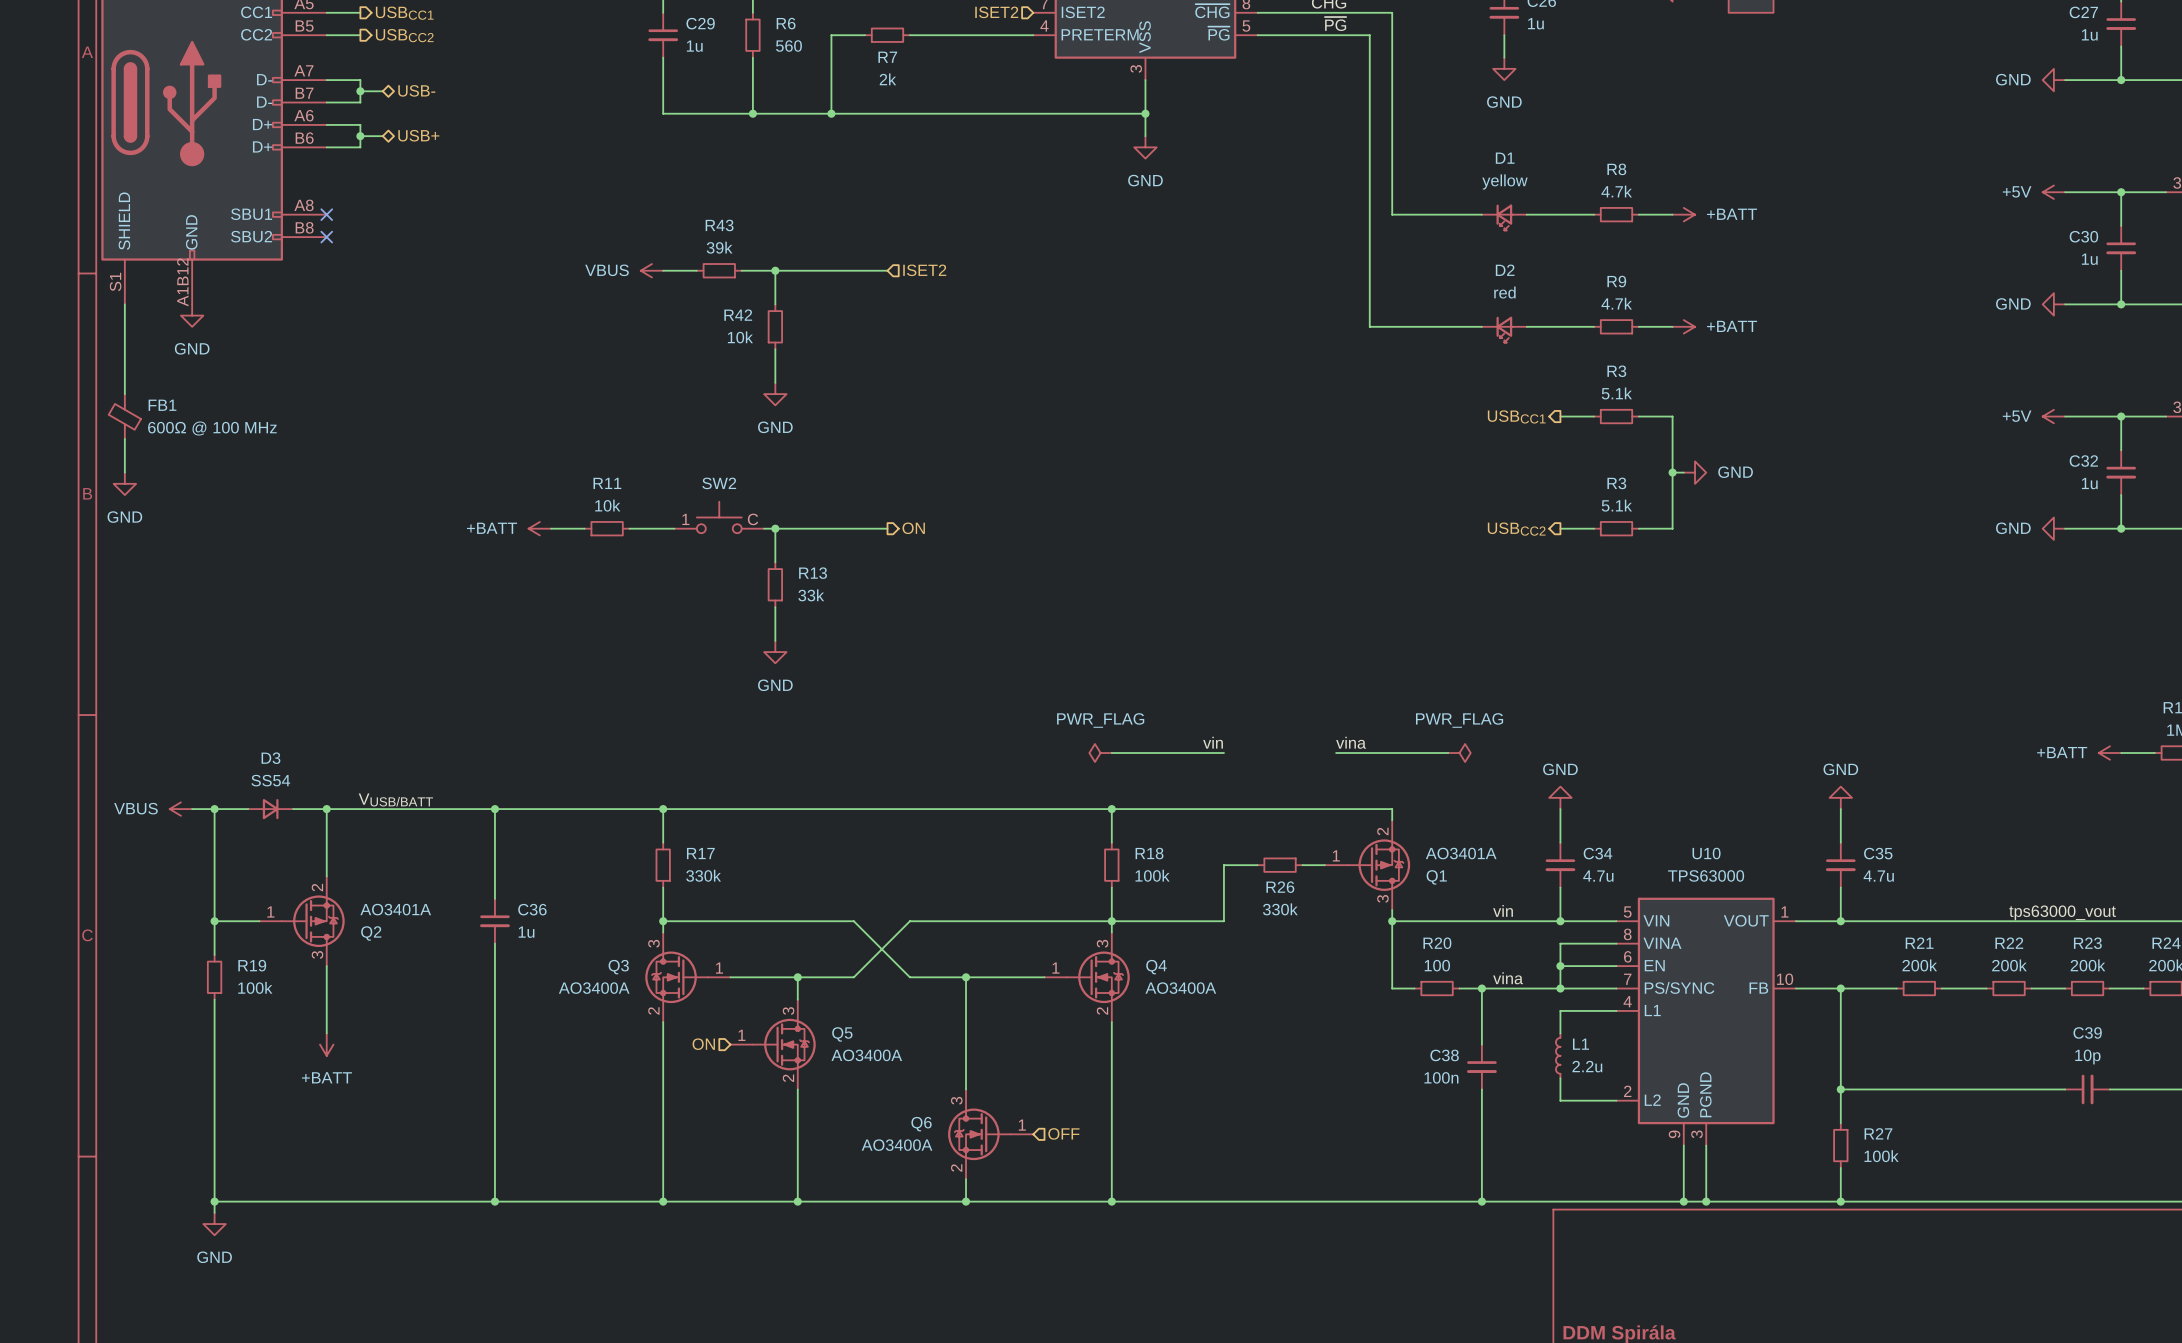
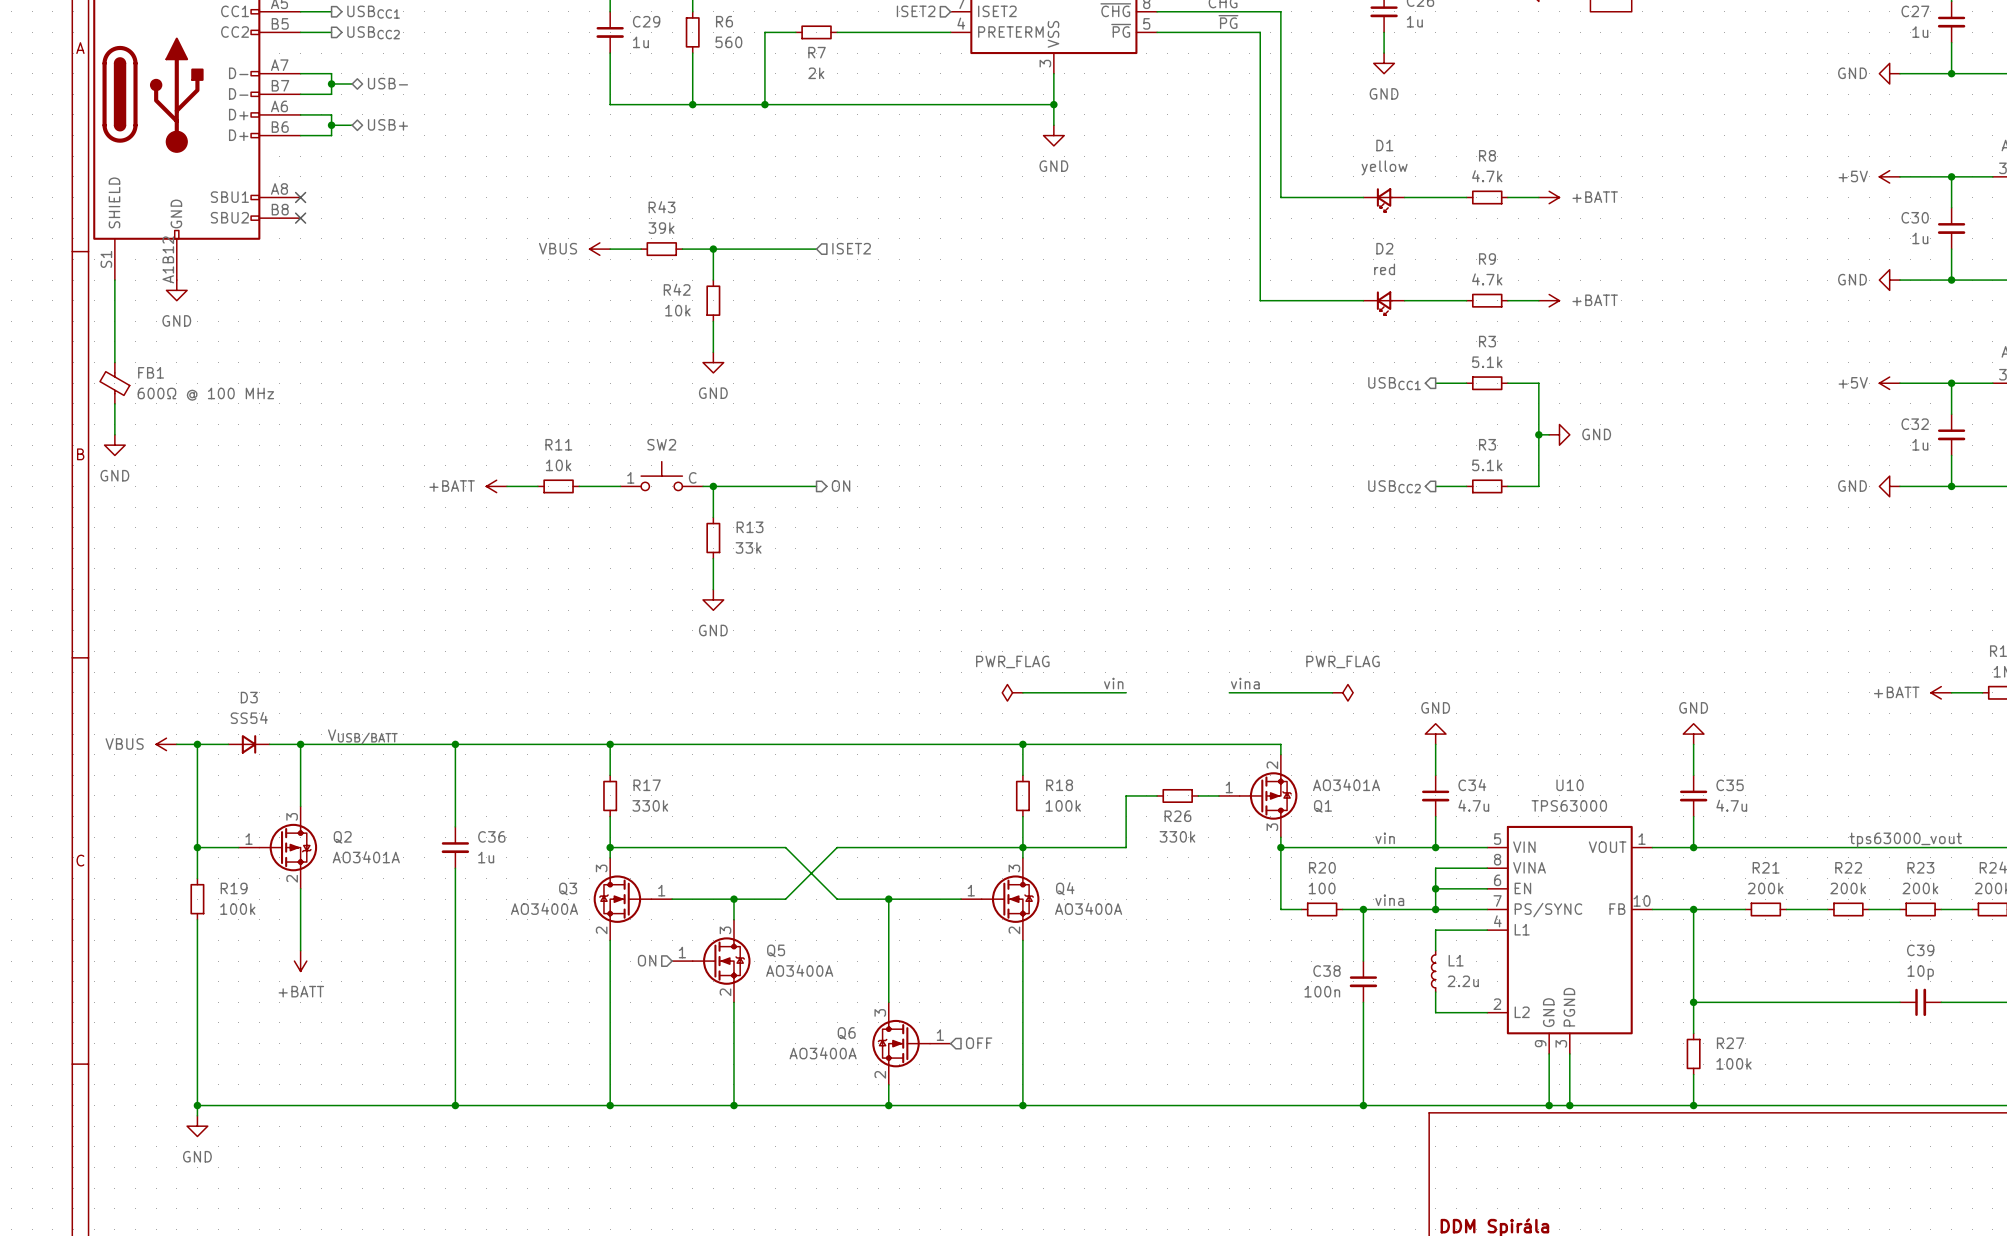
Q2 flip: as is (313, 921) -> up-down (288, 847)

